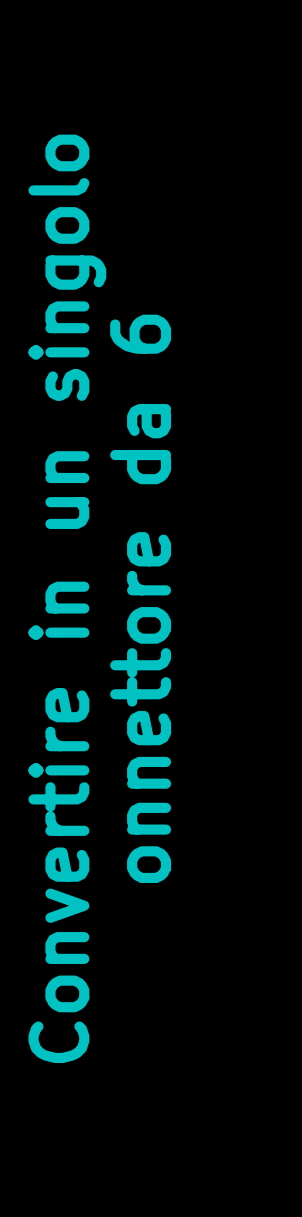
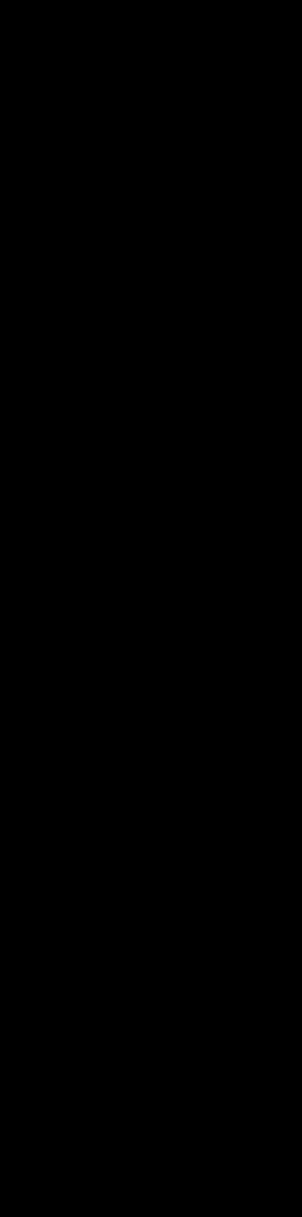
text: Convertire in un singolo (67, 598) -> none
text: onnettore da 6 (140, 598) -> none

